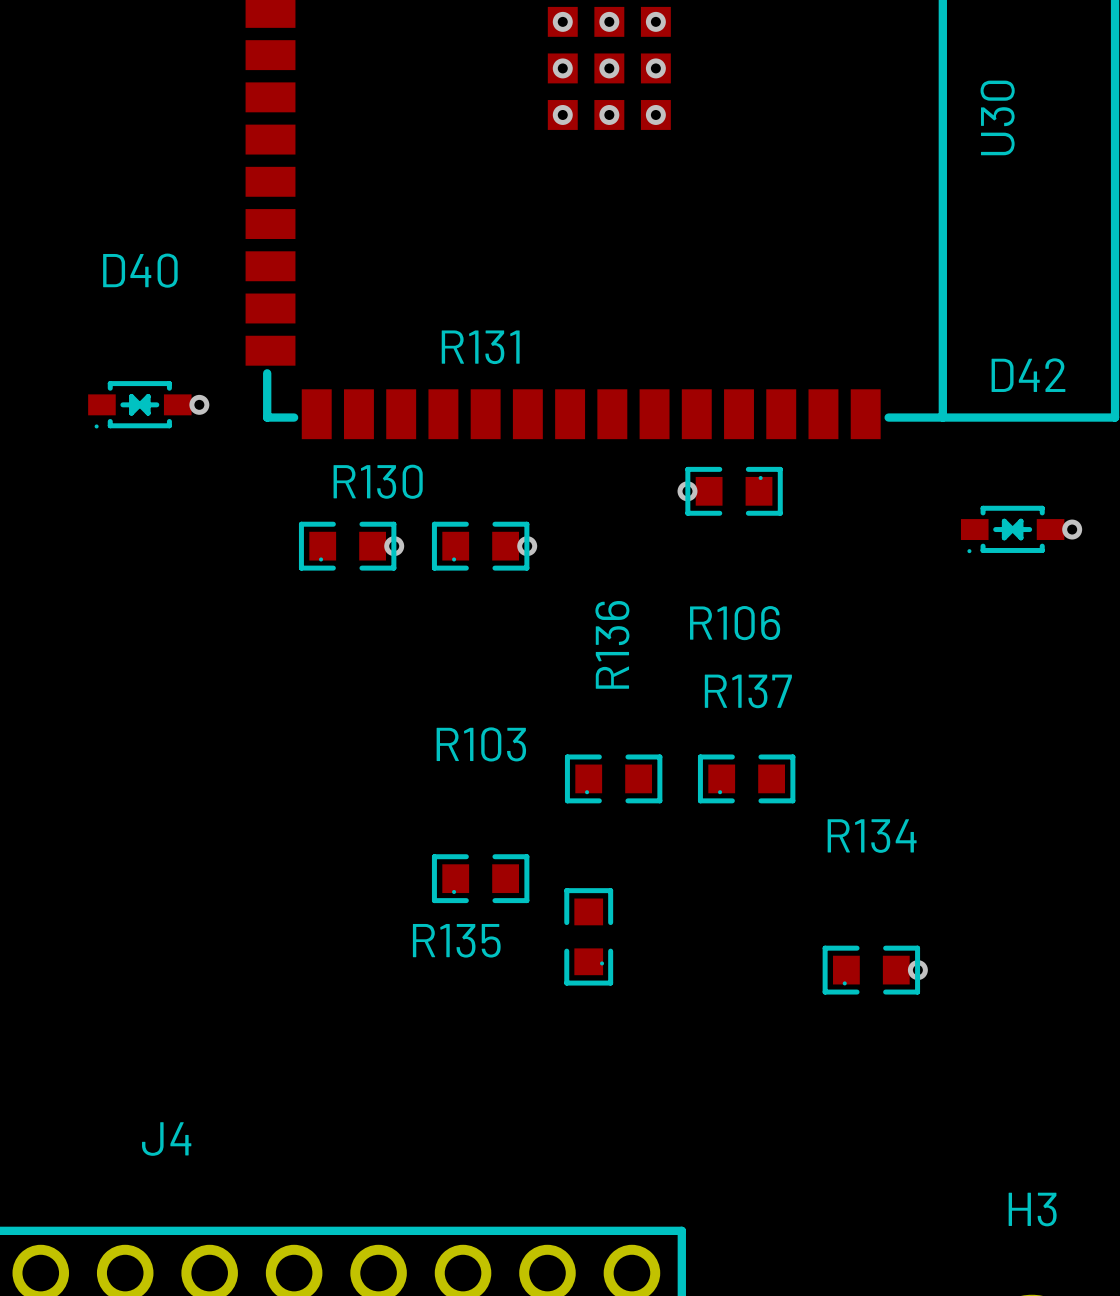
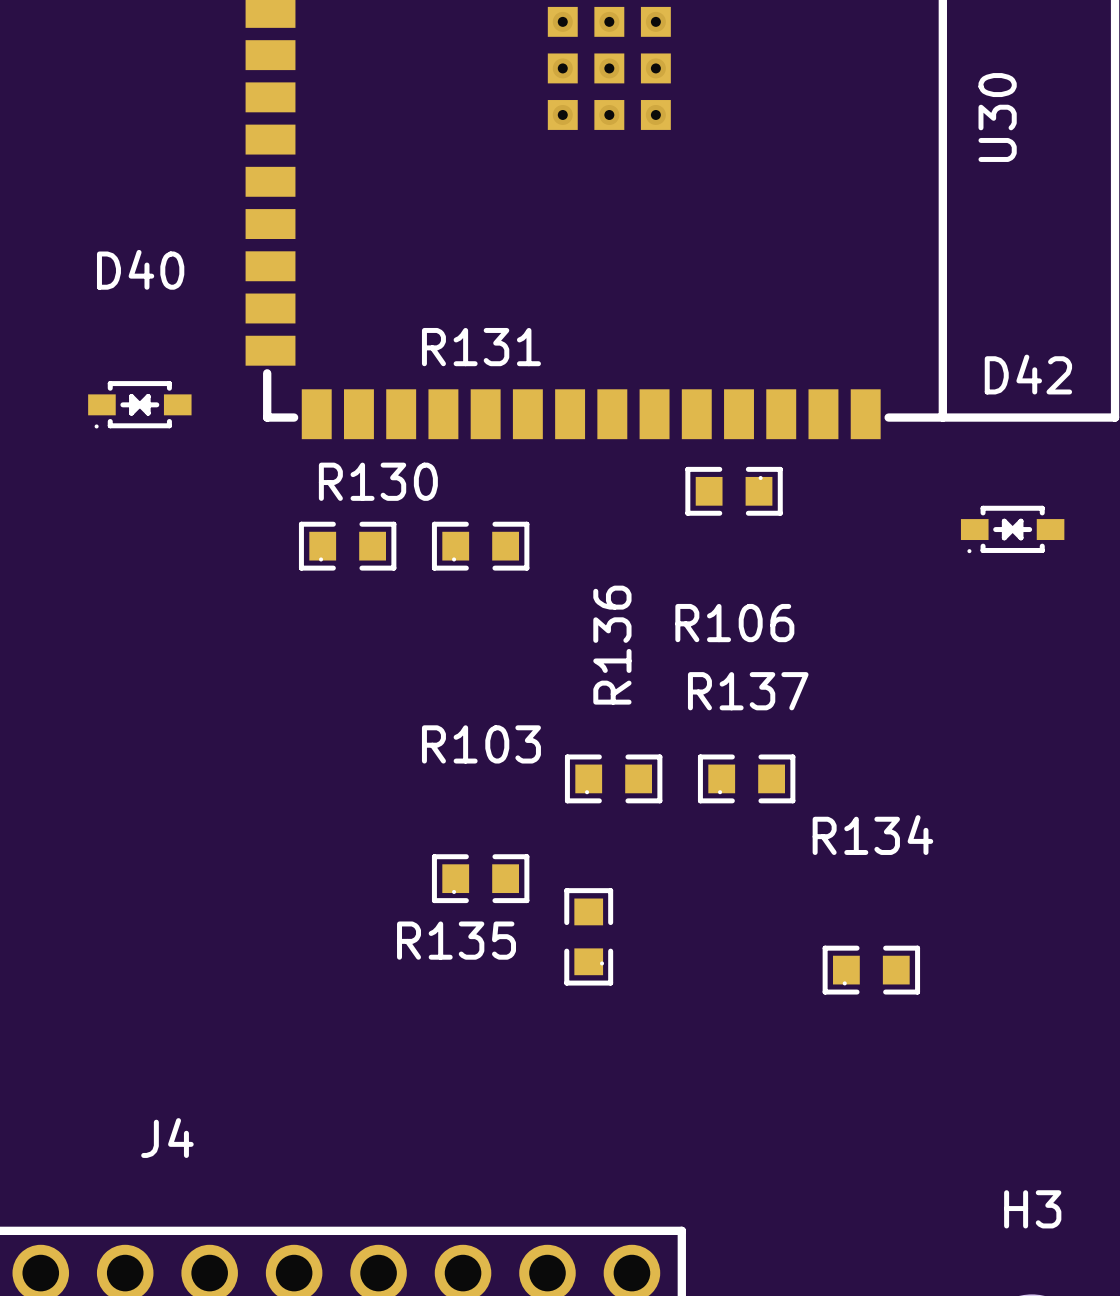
via: (199, 404) -> none
via: (687, 491) -> none
via: (1072, 529) -> none
via: (394, 546) -> none
via: (527, 546) -> none
via: (917, 970) -> none

